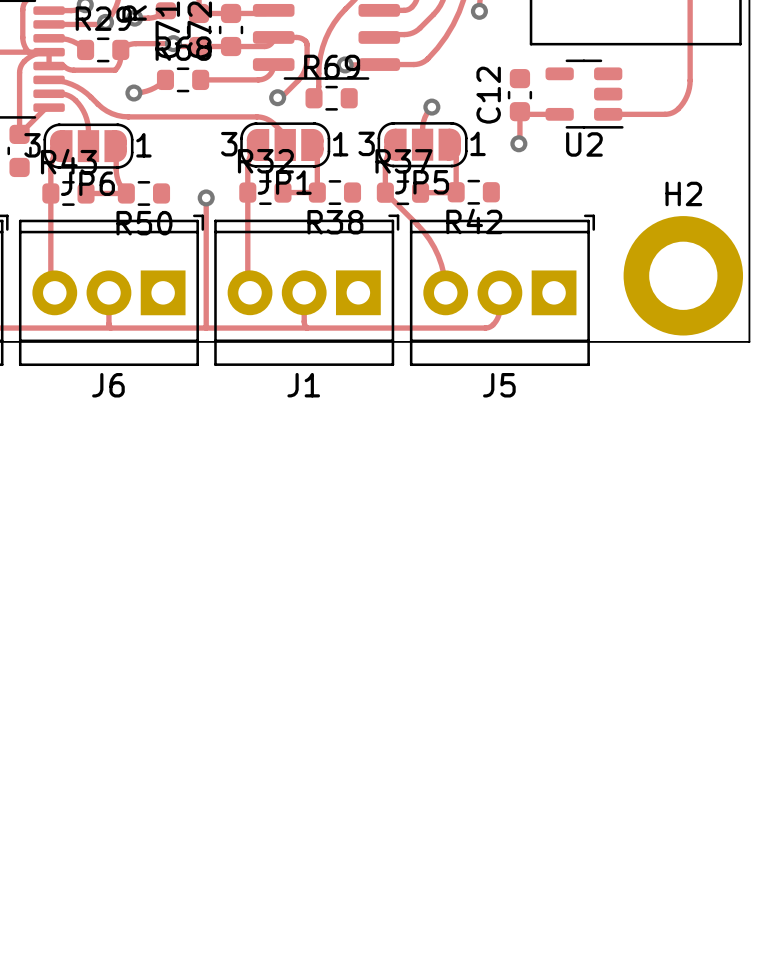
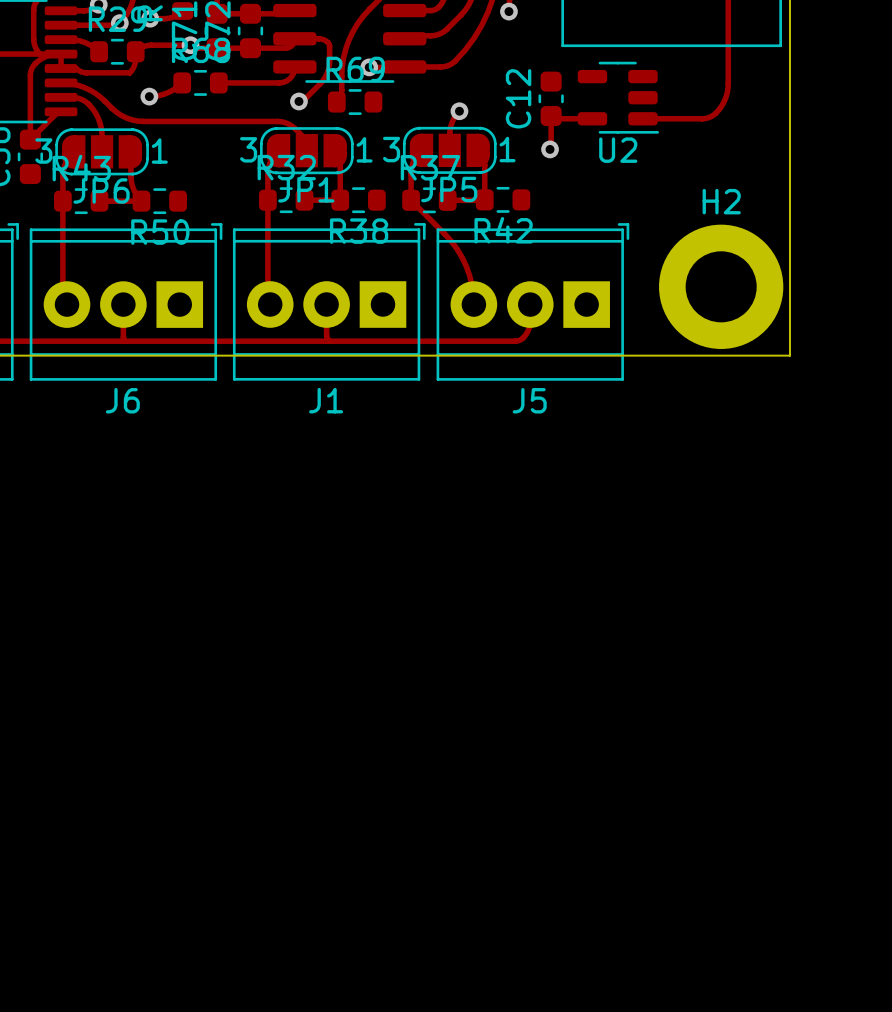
track: (206, 197) (206, 328) -> none
via: (206, 197) -> none

